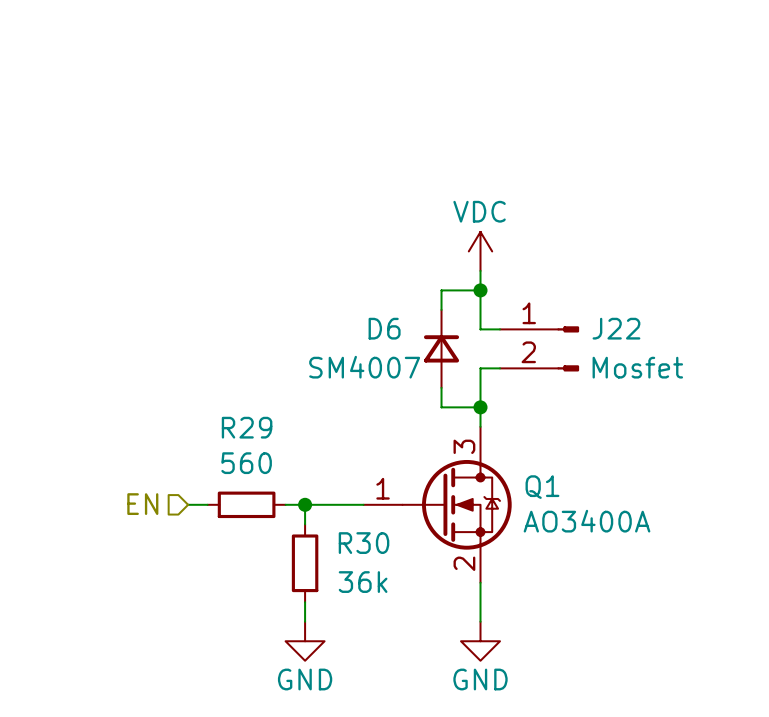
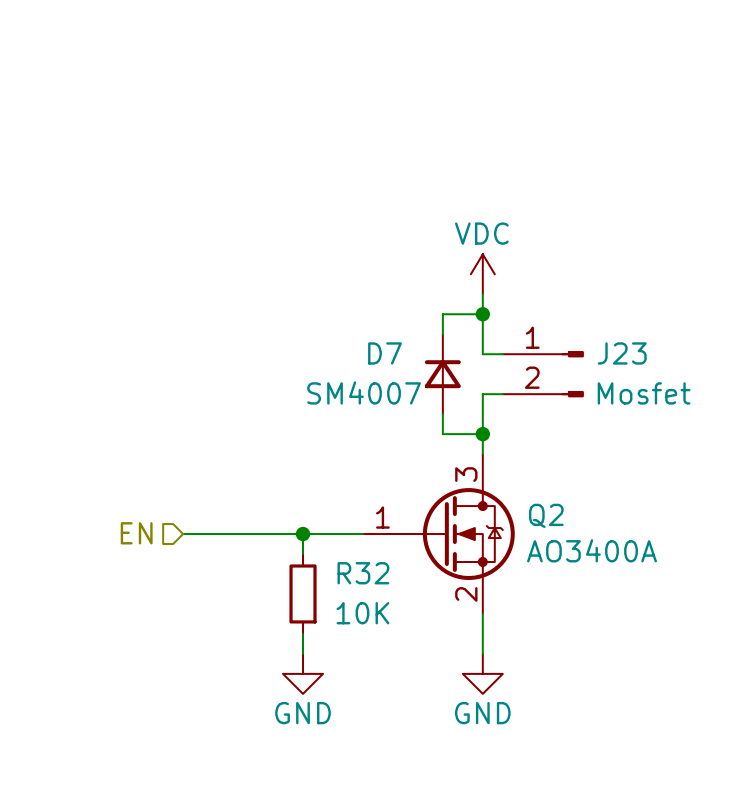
D6 name: D6 (384, 328) -> D7 (384, 353)
J22 name: J22 (616, 328) -> J23 (622, 353)
Q1 name: Q1 (542, 487) -> Q2 (546, 515)
wire: none -> (203, 534) (283, 534)
R29: 560 (246, 504) -> none
R30 name: R30 (364, 543) -> R32 (363, 573)
R30 value: 36k (363, 582) -> 10K (362, 613)

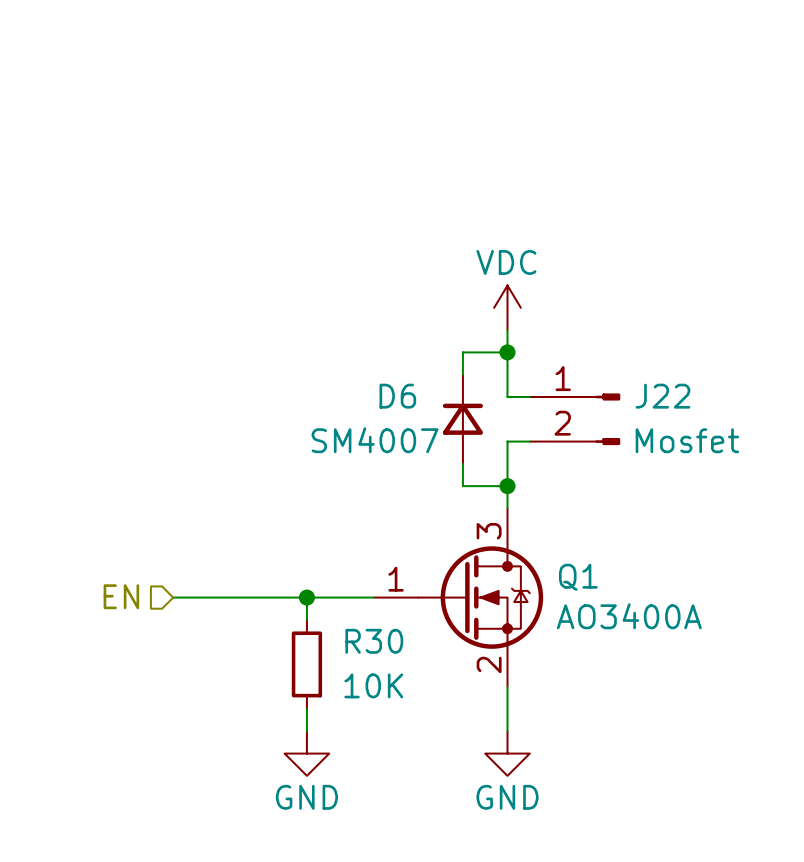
D7 name: D7 (384, 353) -> D6 (397, 396)
J23 name: J23 (622, 353) -> J22 (662, 396)
Q2 name: Q2 (546, 515) -> Q1 (578, 577)
R32 name: R32 (363, 573) -> R30 (374, 641)

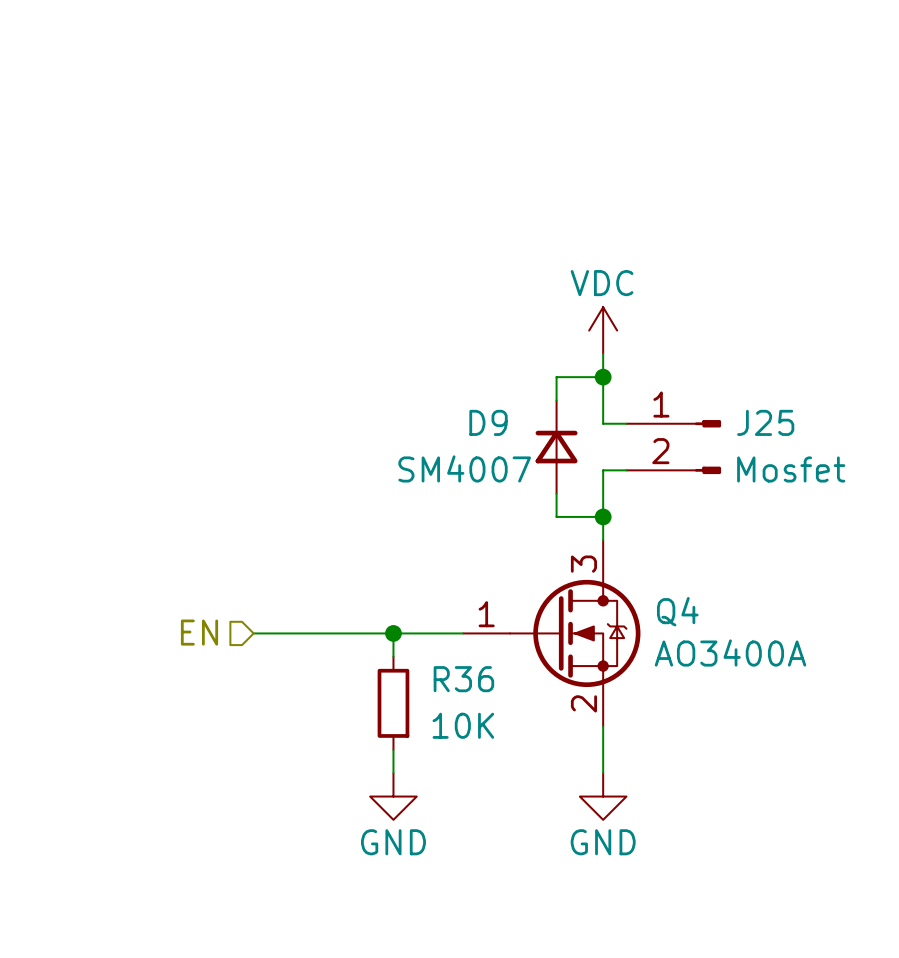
D6 name: D6 (397, 396) -> D9 (488, 422)
J22 name: J22 (662, 396) -> J25 (765, 422)
Q1 name: Q1 (578, 577) -> Q4 (677, 611)
R30 name: R30 (374, 641) -> R36 (463, 679)

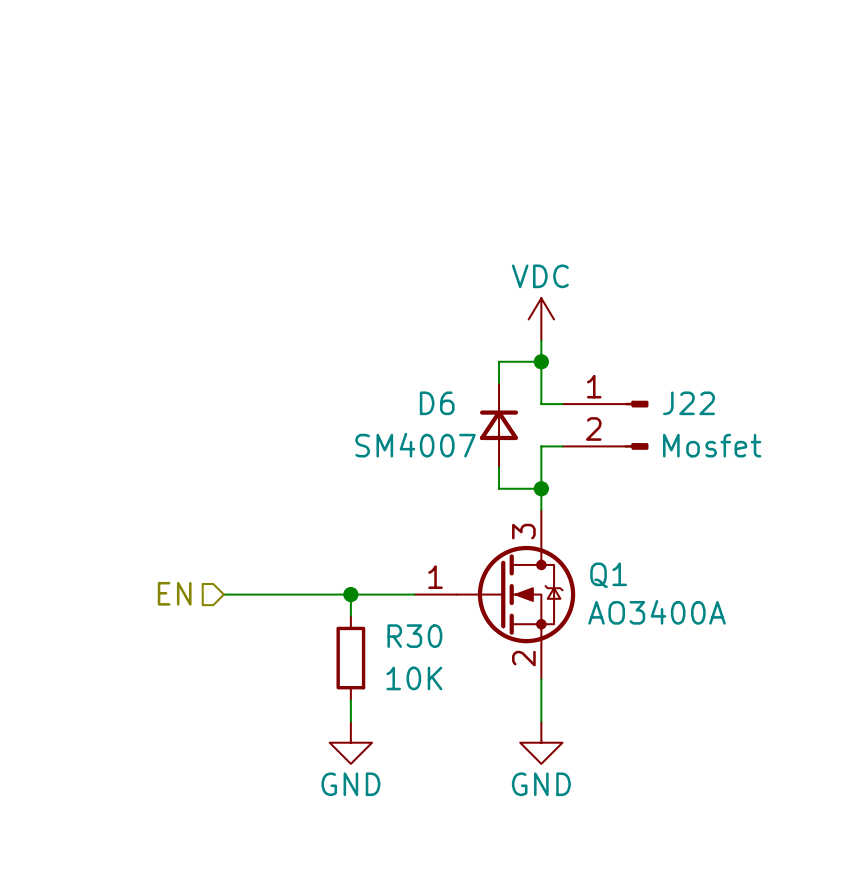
D9 name: D9 (488, 422) -> D6 (437, 403)
J25 name: J25 (765, 422) -> J22 (688, 403)
Q4 name: Q4 (677, 611) -> Q1 (608, 575)
R36 name: R36 (463, 679) -> R30 (414, 636)

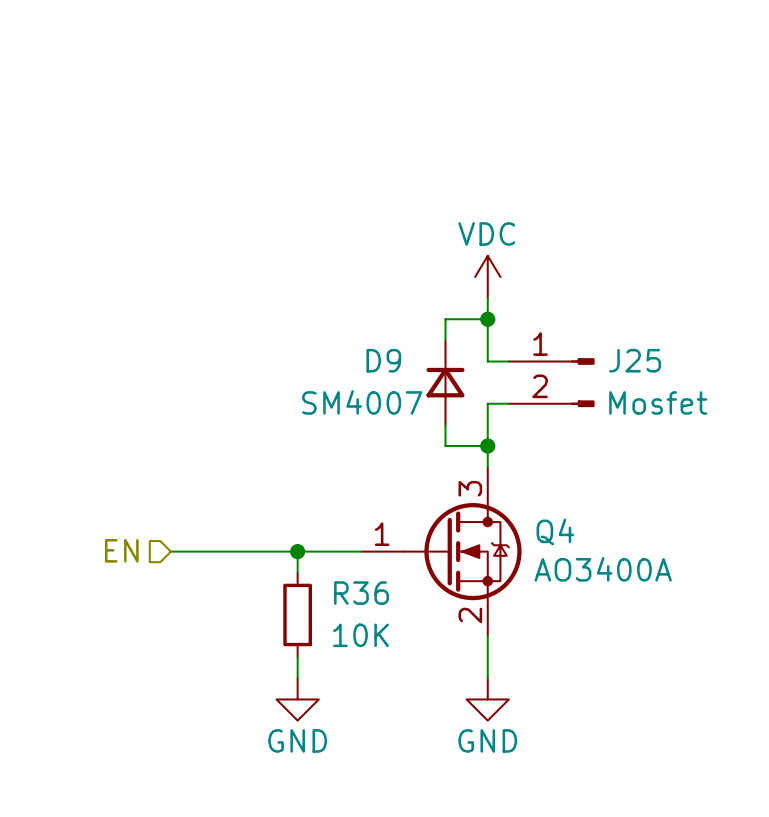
D6 name: D6 (437, 403) -> D9 (383, 360)
J22 name: J22 (688, 403) -> J25 (635, 360)
Q1 name: Q1 (608, 575) -> Q4 (555, 531)
R30 name: R30 (414, 636) -> R36 (361, 593)

